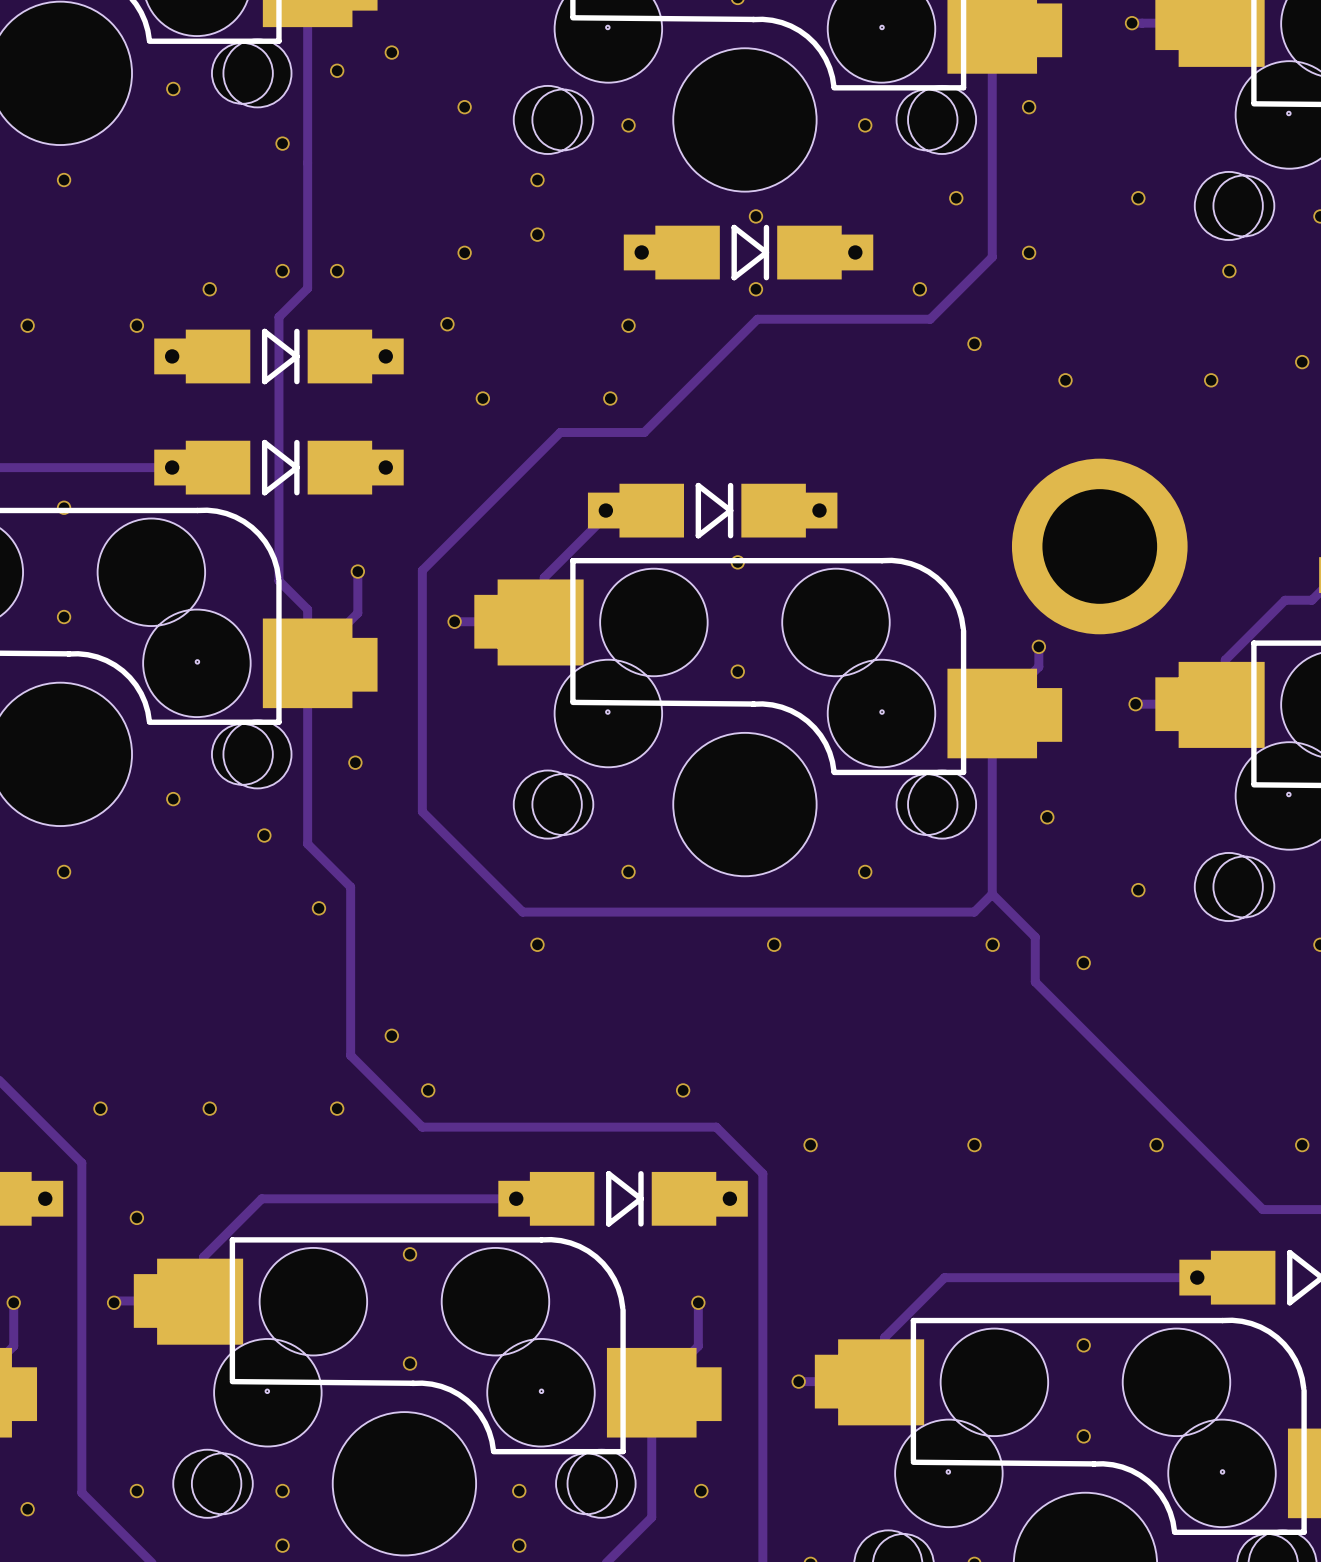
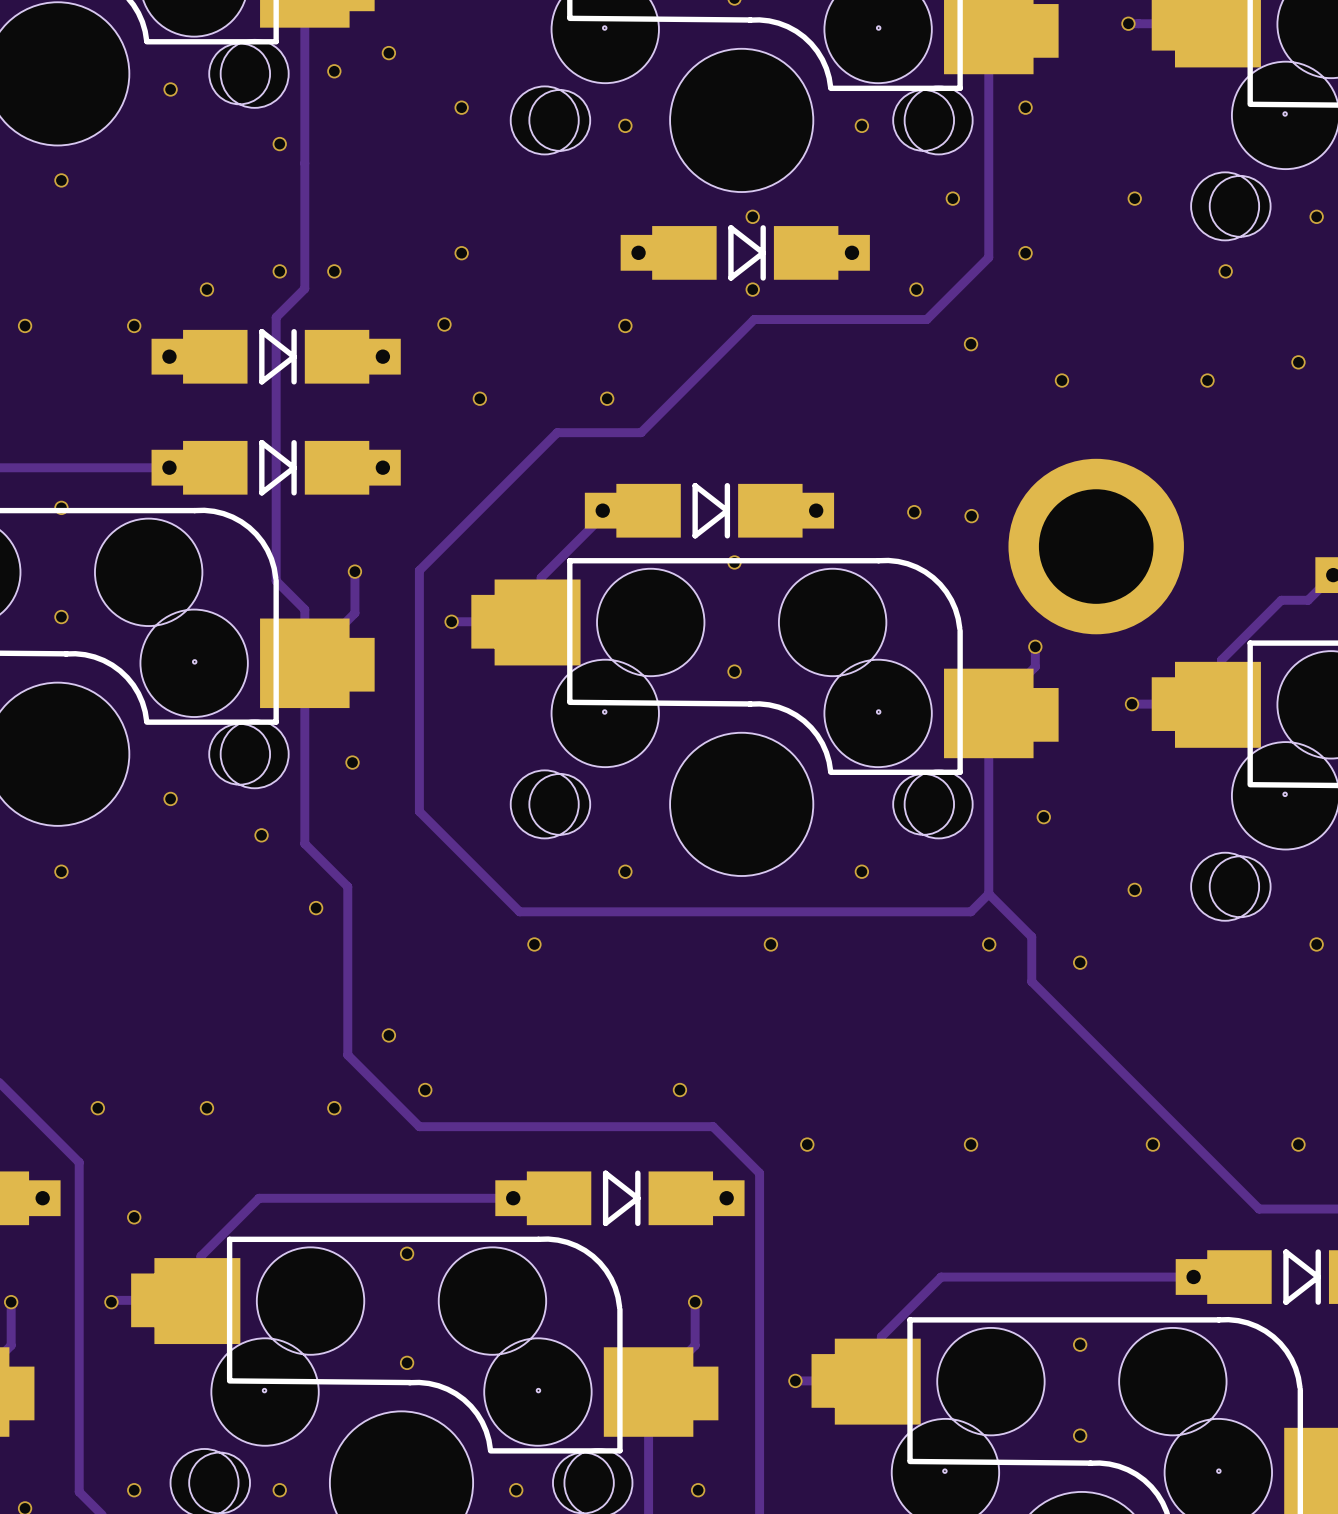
via: (537, 180) -> none
via: (537, 234) -> none
via: none -> (914, 512)
via: none -> (971, 516)

